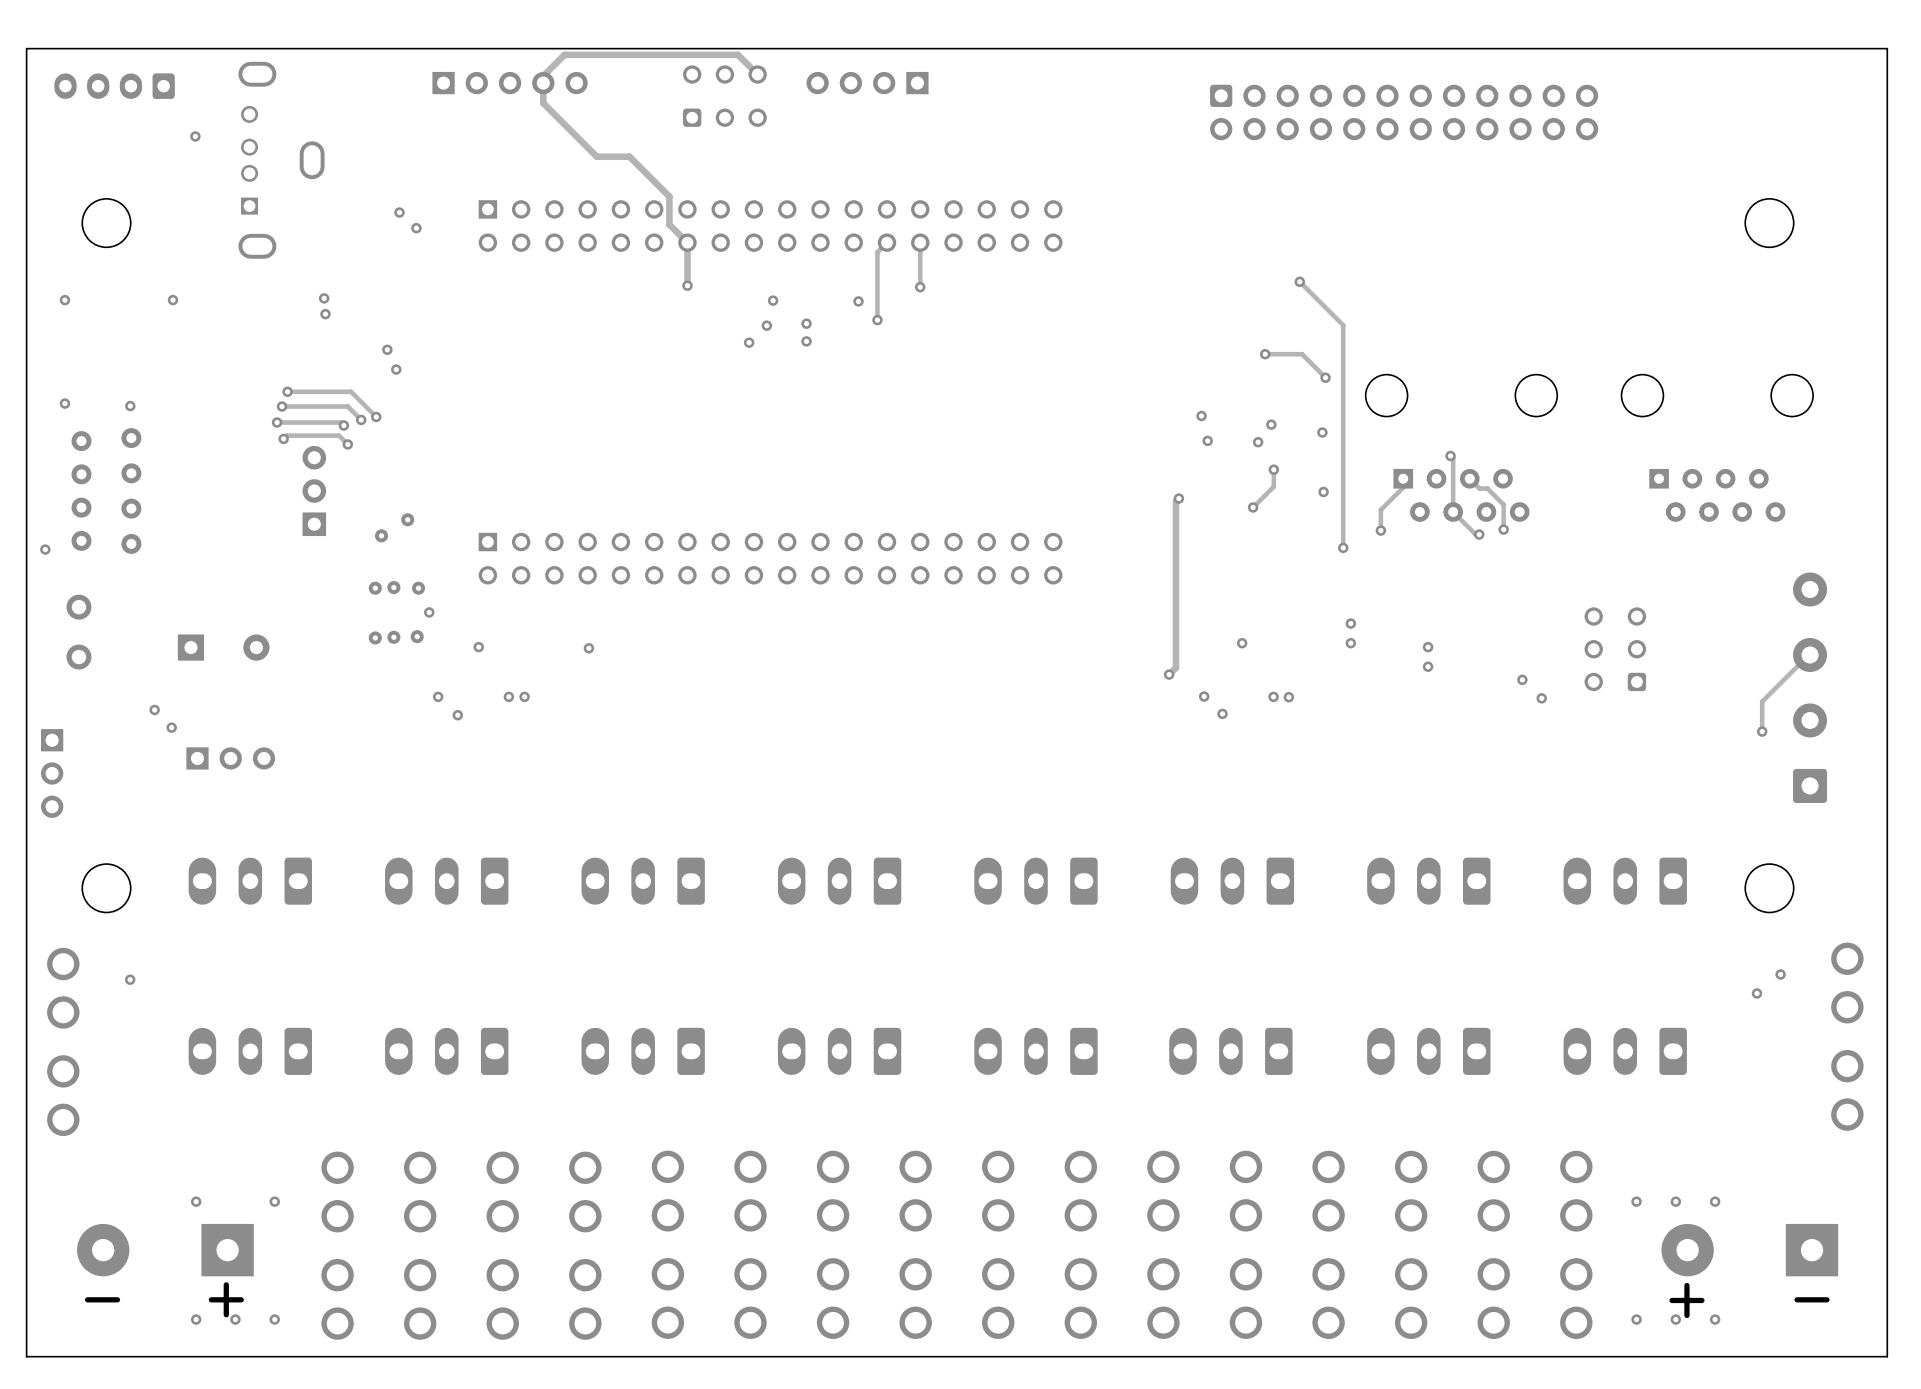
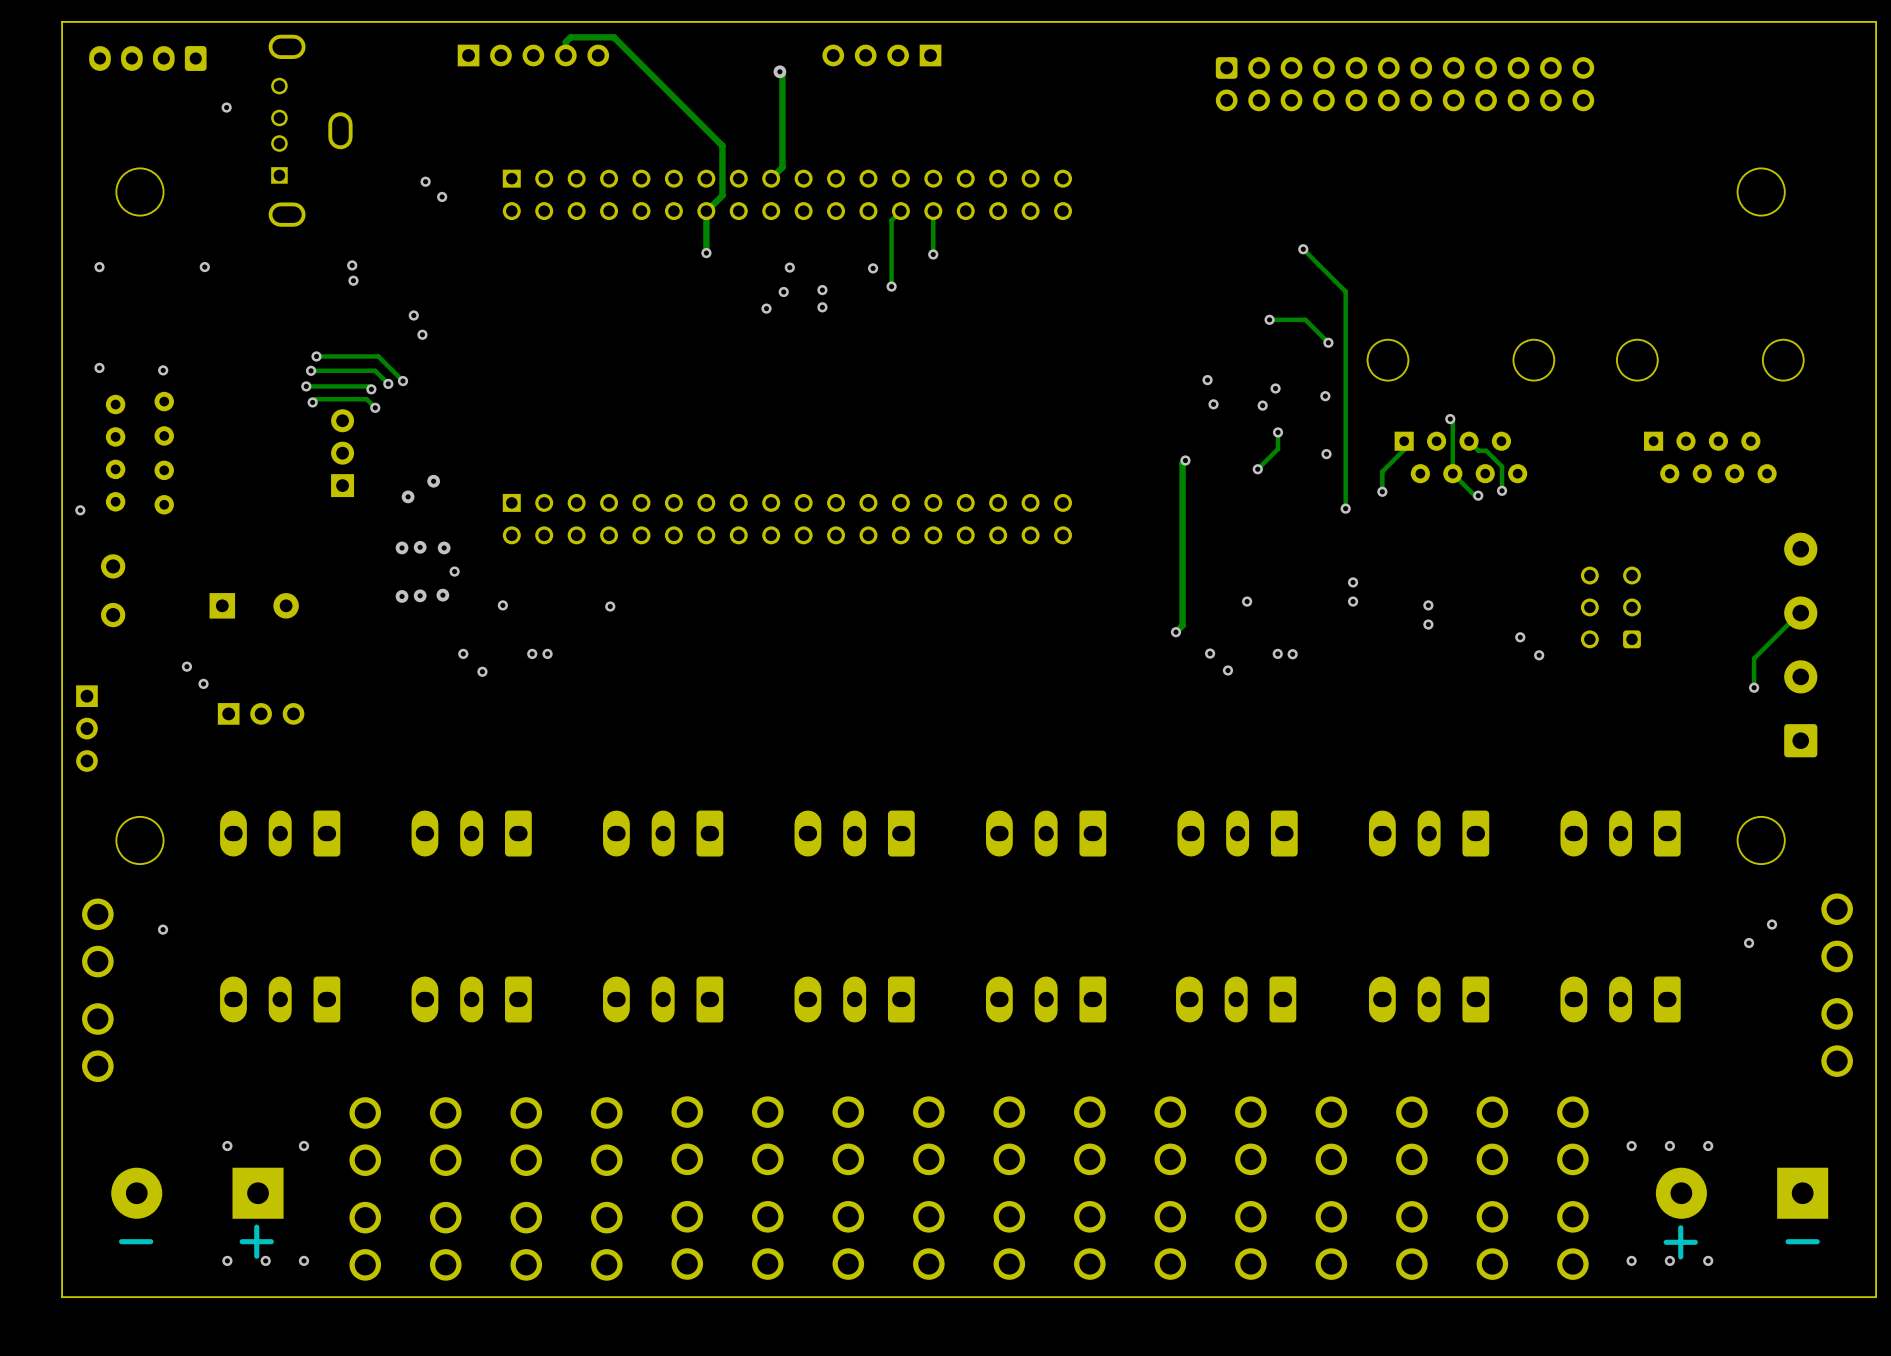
track: (757, 74) (738, 54) (564, 54) (543, 76) -> none
track: (543, 83) (543, 103) (596, 156) (629, 156) (669, 196) (669, 224) (687, 242) -> (565, 48) (565, 42) (570, 37) (613, 37) (722, 145) (722, 195) (706, 211)
part: (724, 96) -> none
track: none -> (779, 71) (782, 74) (782, 167) (771, 178)
via: none -> (779, 71)

